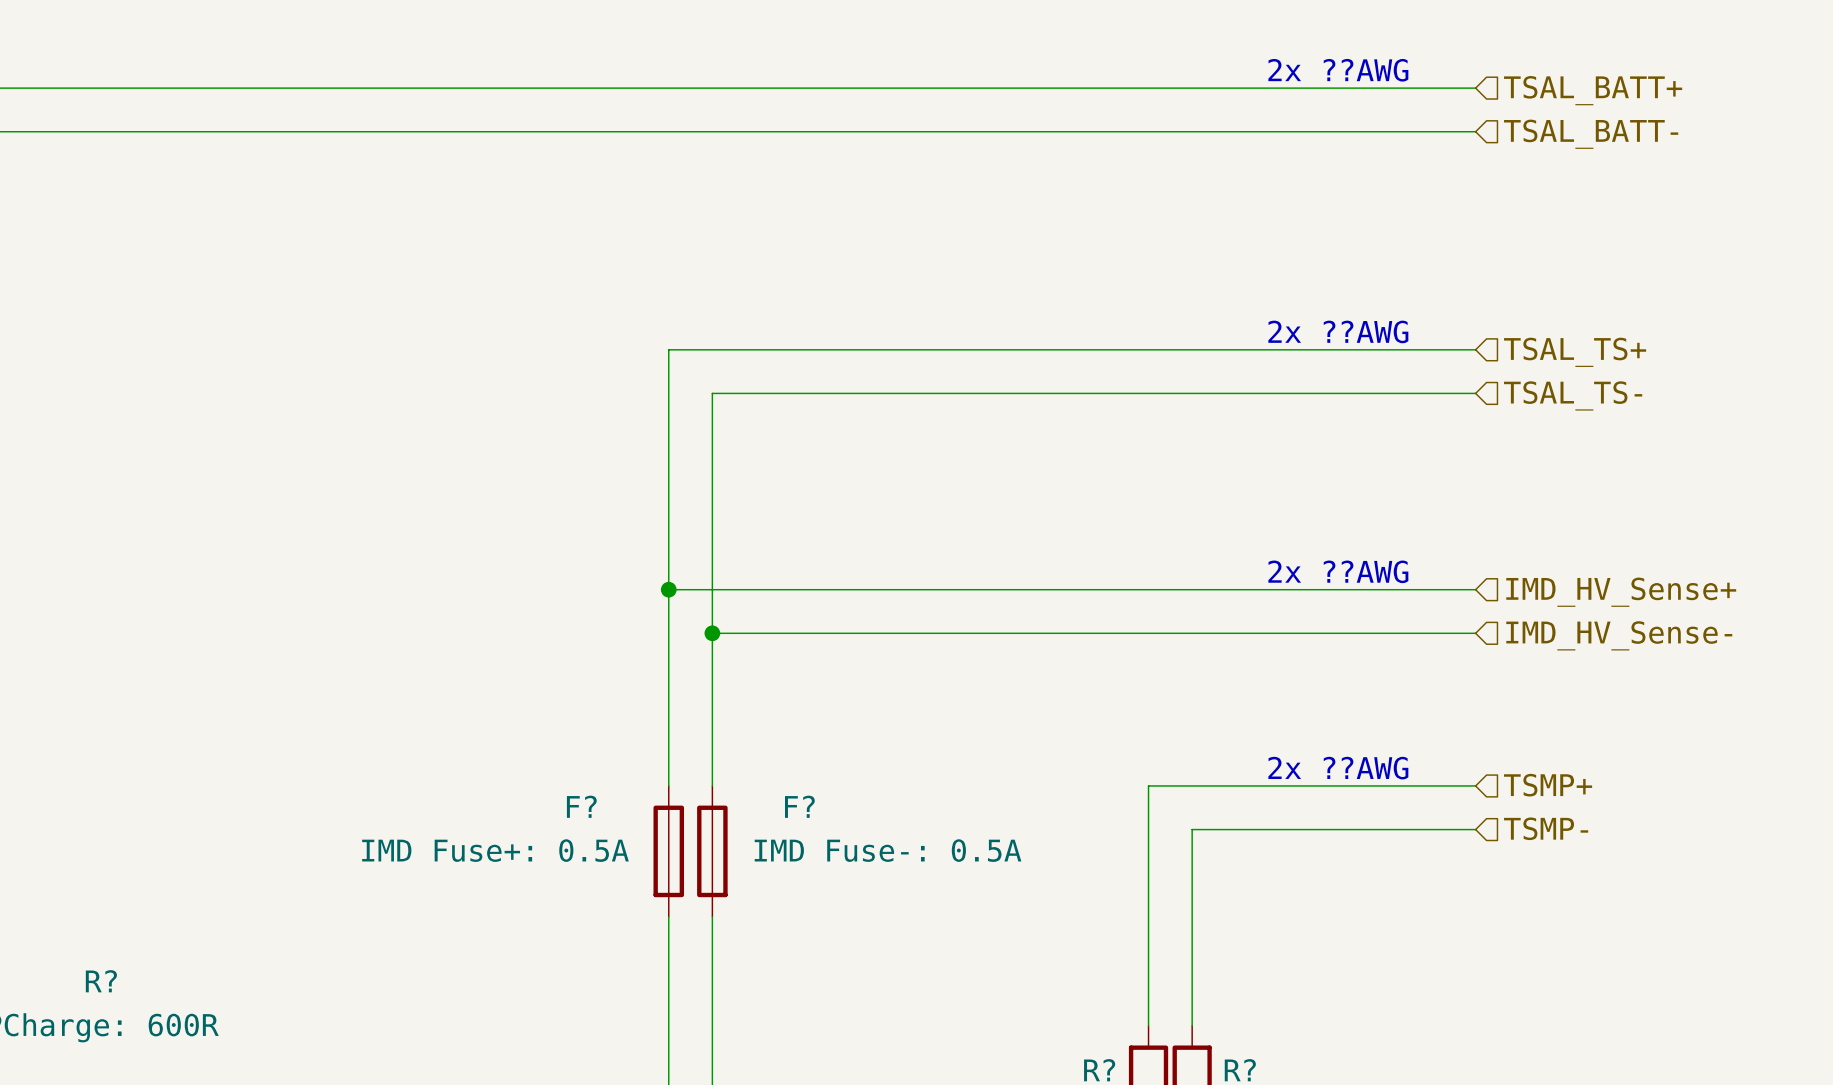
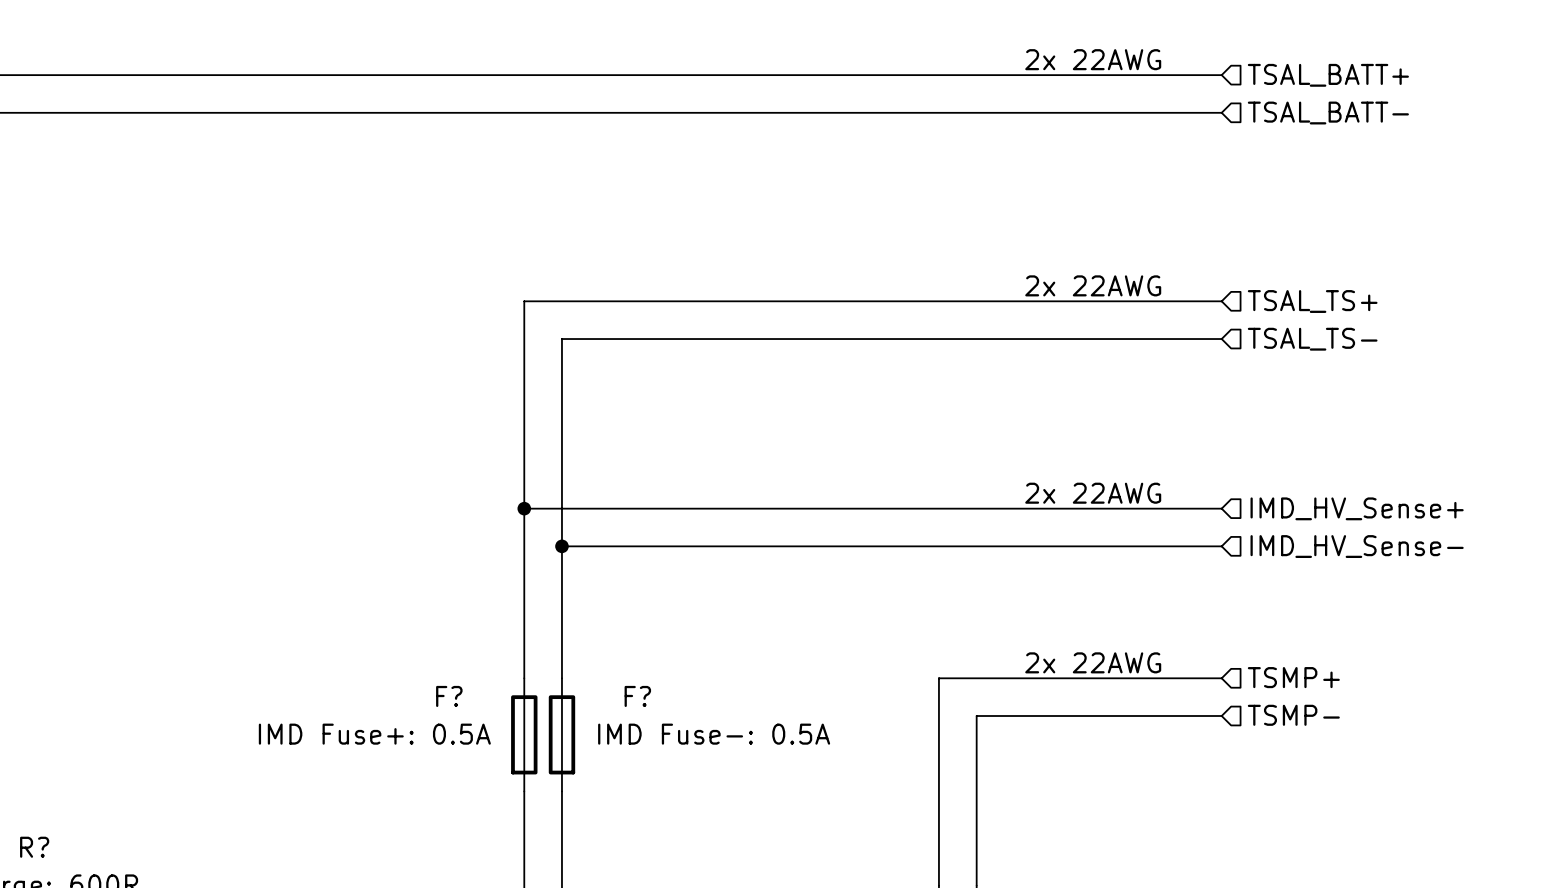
text: 2x ??AWG (1338, 70) -> 2x 22AWG (1093, 59)
text: 2x ??AWG (1338, 331) -> 2x 22AWG (1093, 285)
text: 2x ??AWG (1338, 571) -> 2x 22AWG (1093, 493)
text: 2x ??AWG (1338, 768) -> 2x 22AWG (1093, 662)

